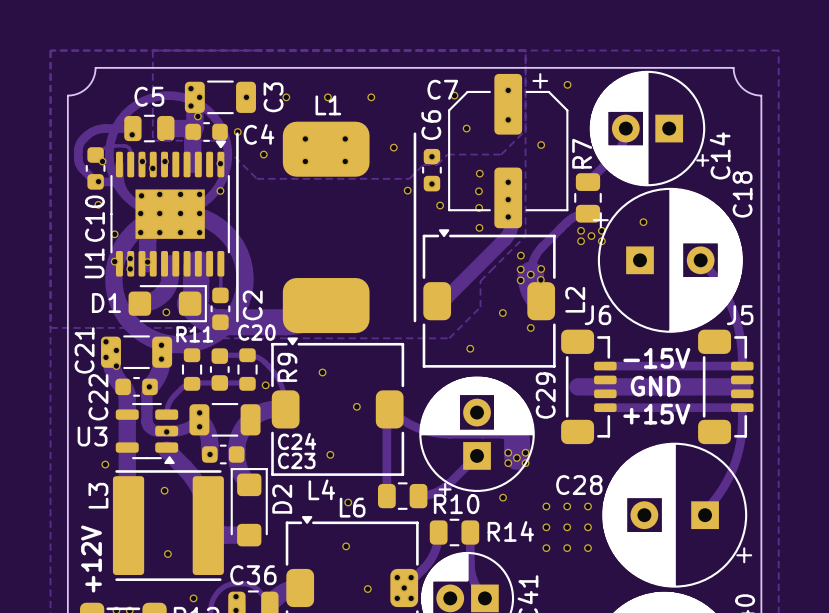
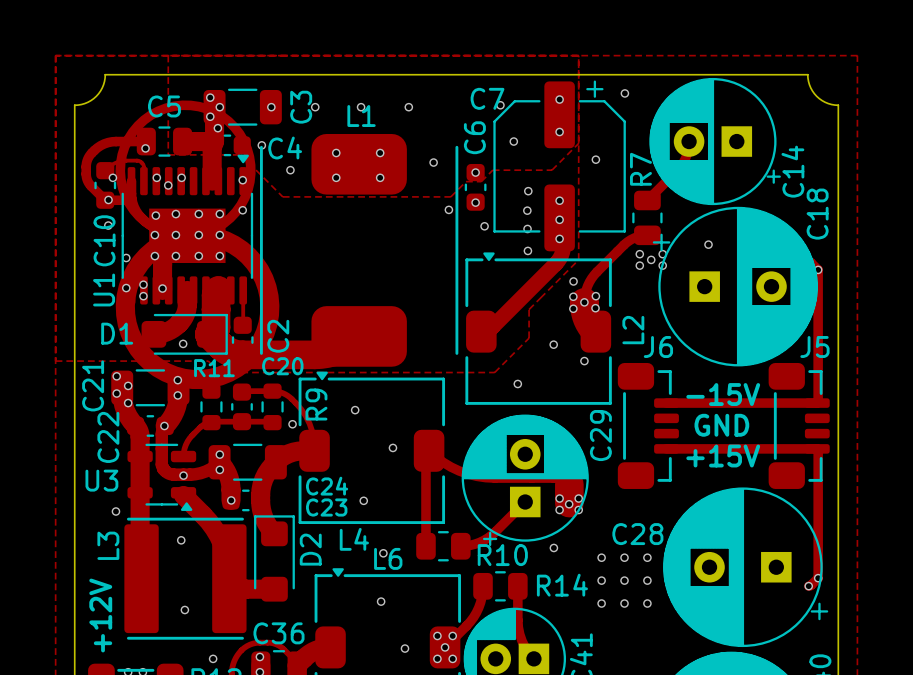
via: none -> (818, 269)
track: (700, 260) (715, 277) (731, 306) (740, 338) (742, 366) -> (808, 261) (818, 269) (817, 403)
track: (577, 386) (742, 386) -> none
track: (742, 407) (741, 431) (736, 460) (723, 487) (705, 510) (705, 515) -> (817, 448) (818, 578) (808, 586)
via: none -> (818, 578)
via: none -> (808, 586)

